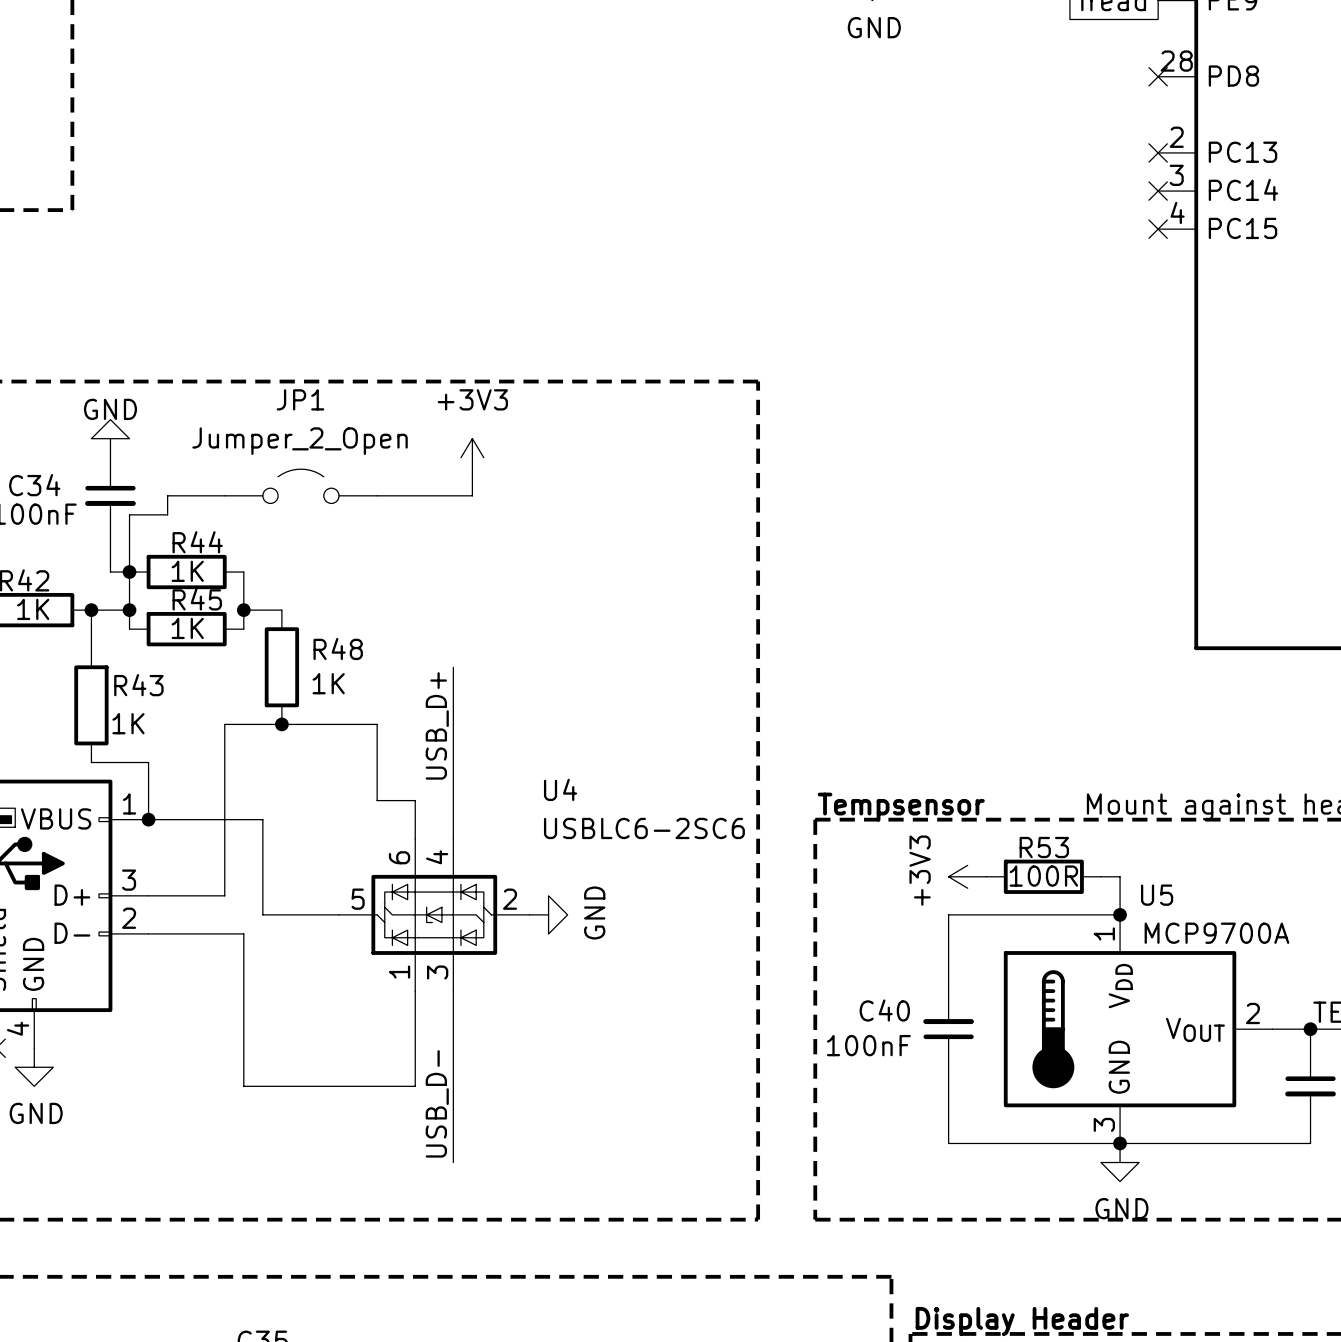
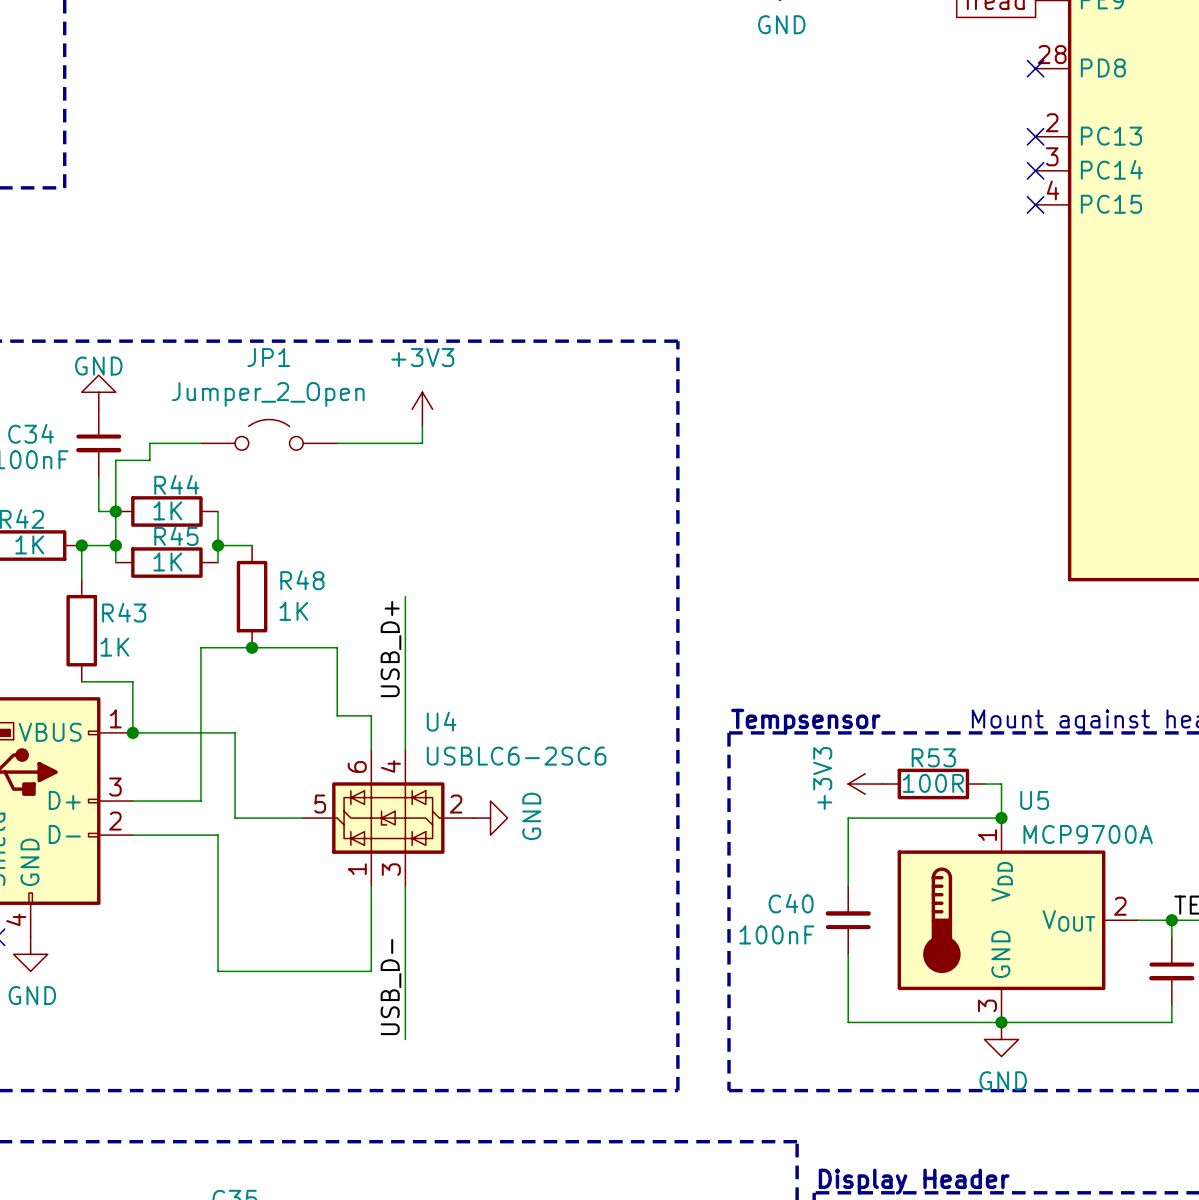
U4 name position: U4 (560, 789) -> U4 (441, 721)
U4 value position: USBLC6-2SC6 (644, 828) -> USBLC6-2SC6 (516, 756)

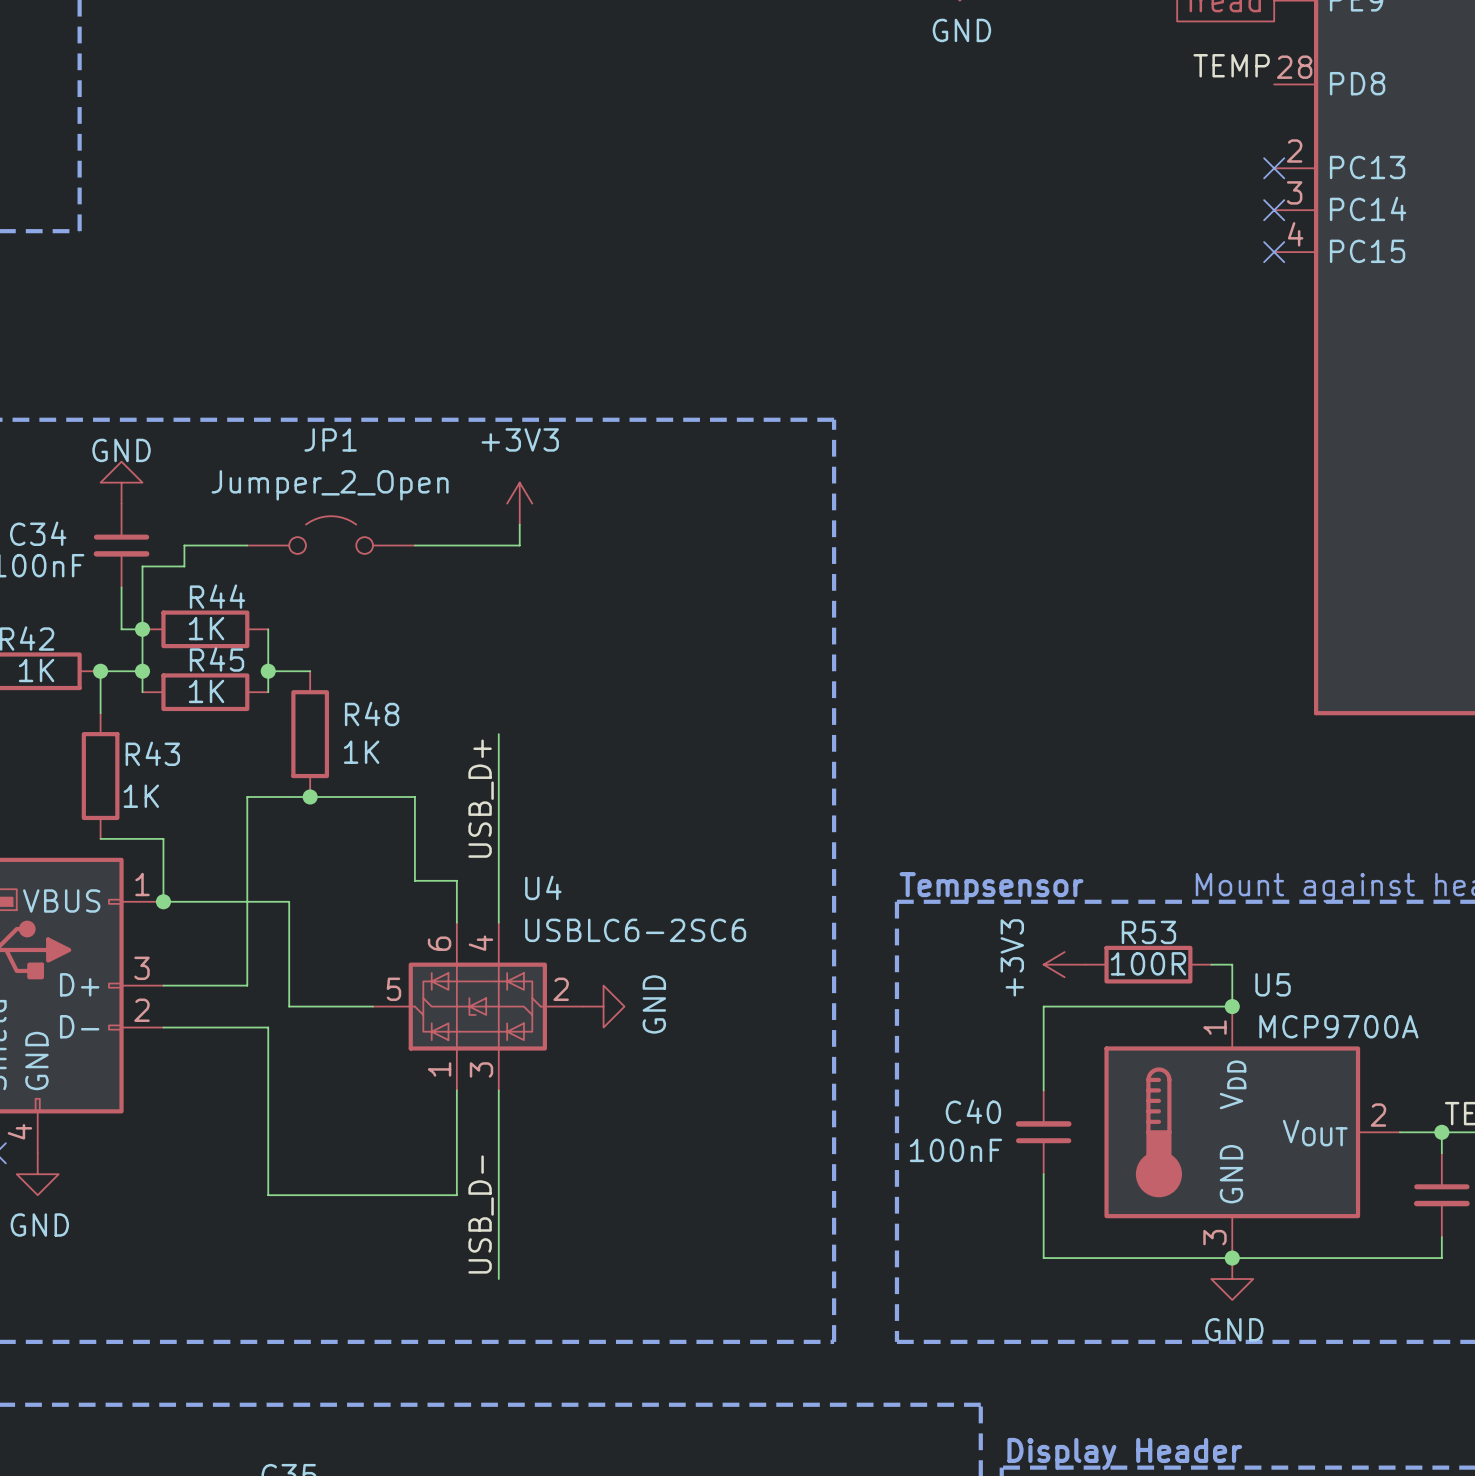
label: none -> TEMP (1231, 65)
no-connect mark: (1035, 68) -> none

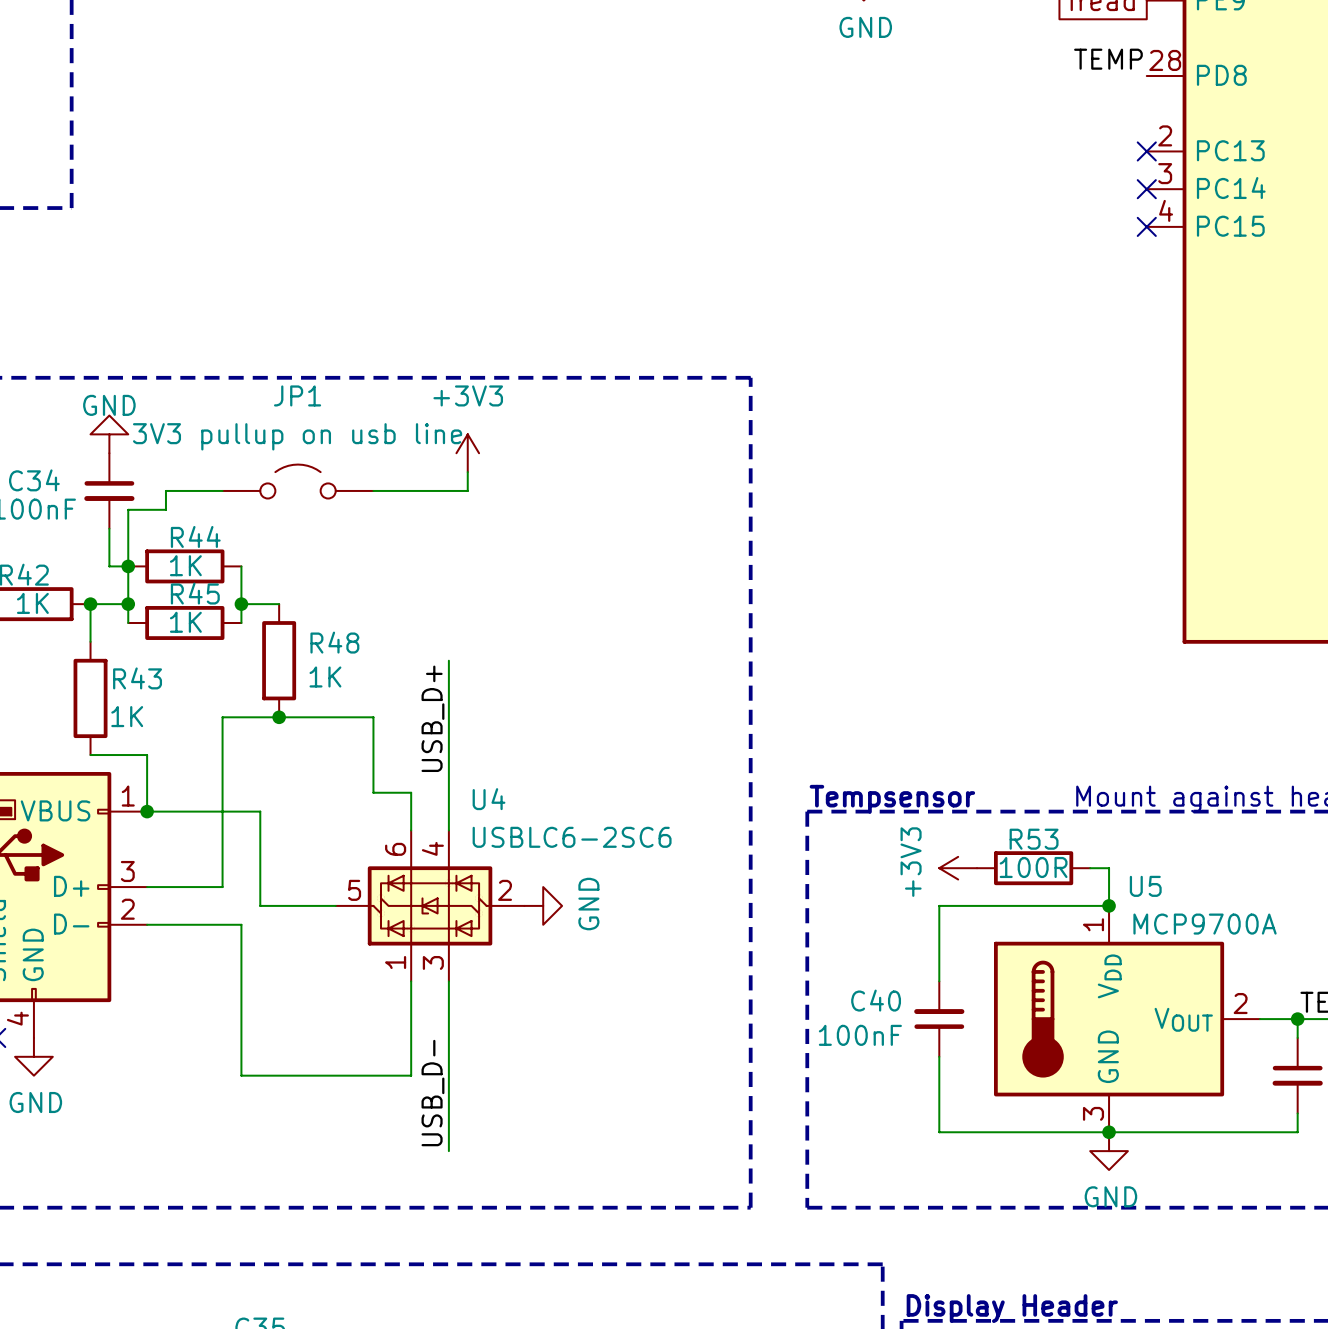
JP1 value: Jumper_2_Open (330, 485) -> 3V3 pullup on usb line (297, 436)

